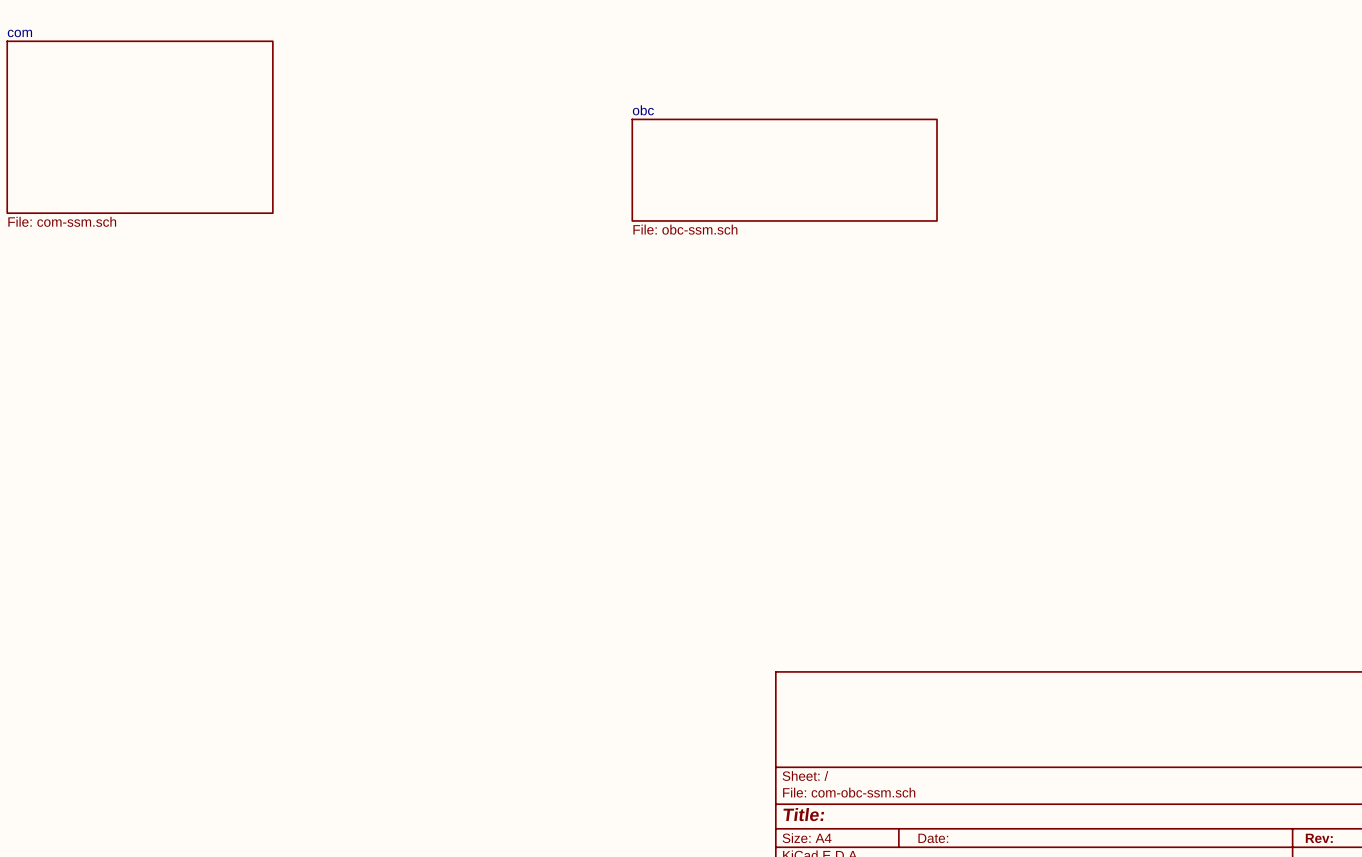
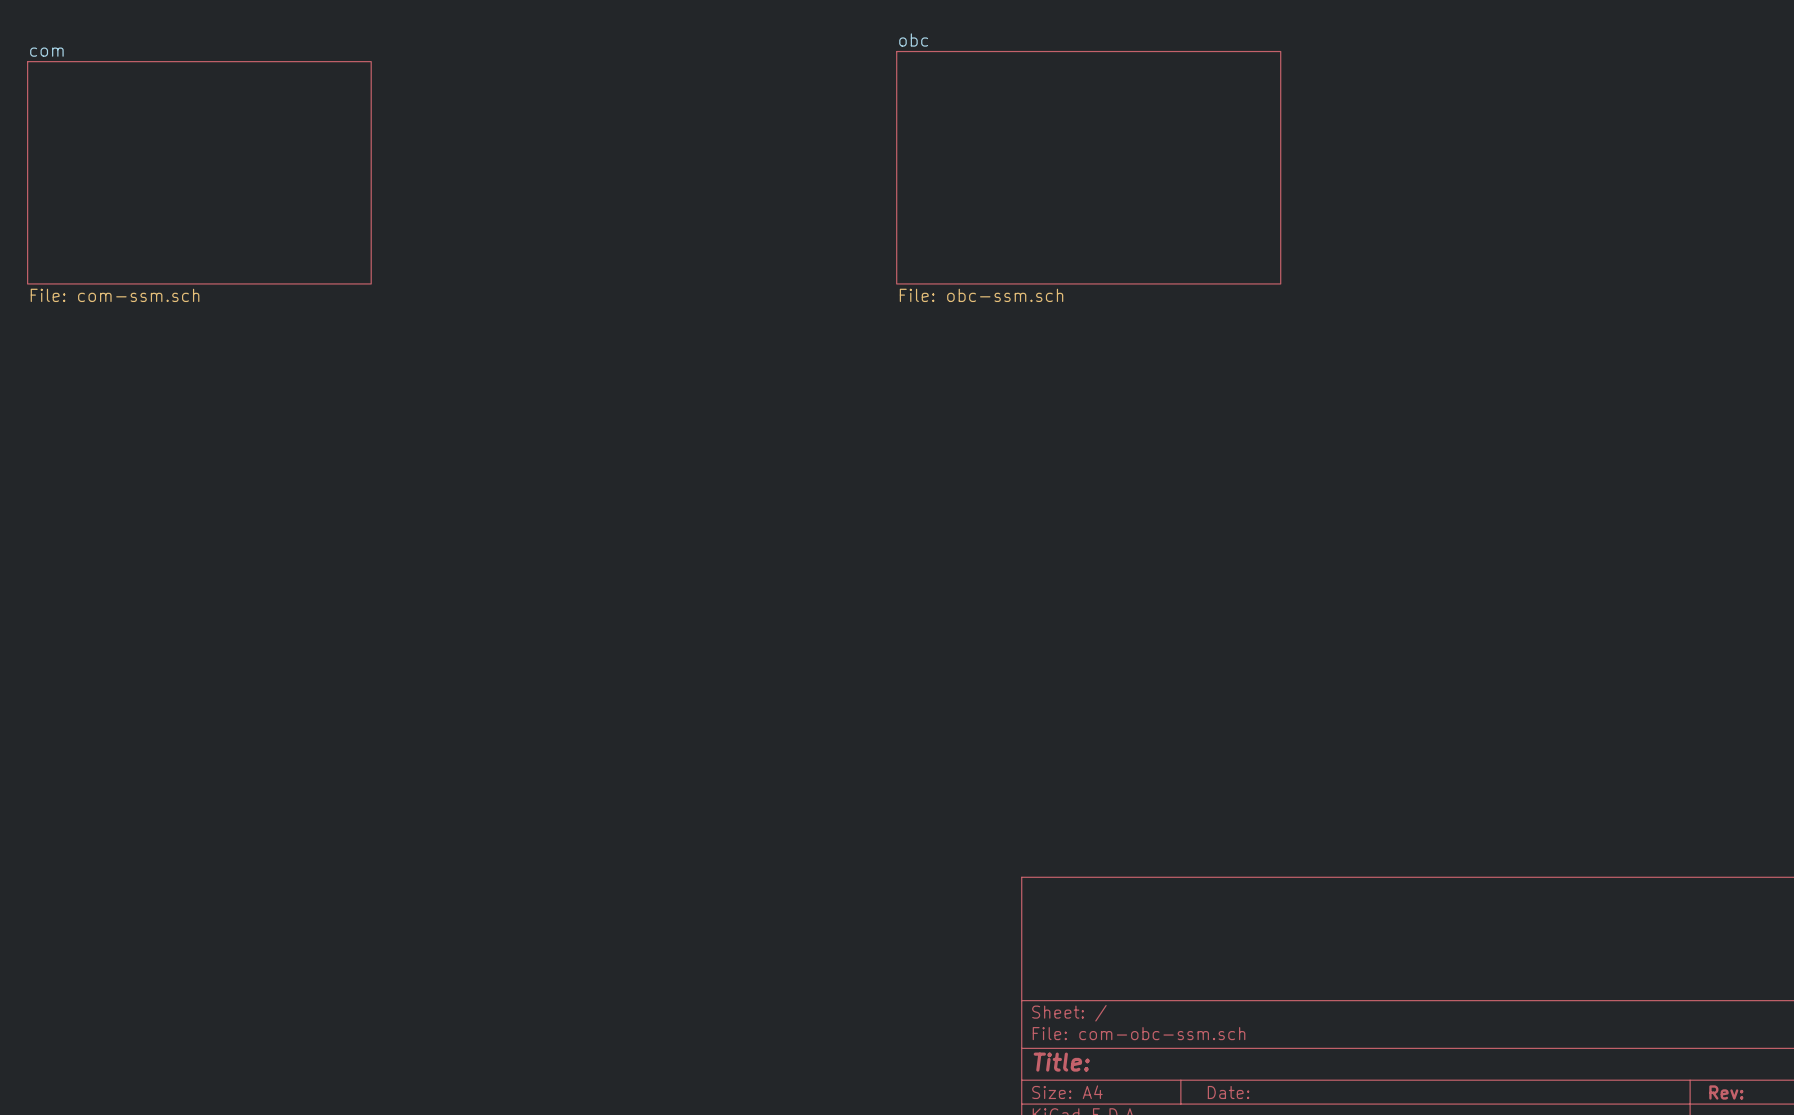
sheet obc: none -> File: obc-ssm.sch (1088, 167)
sheet obc: File: obc-ssm.sch (784, 170) -> none

